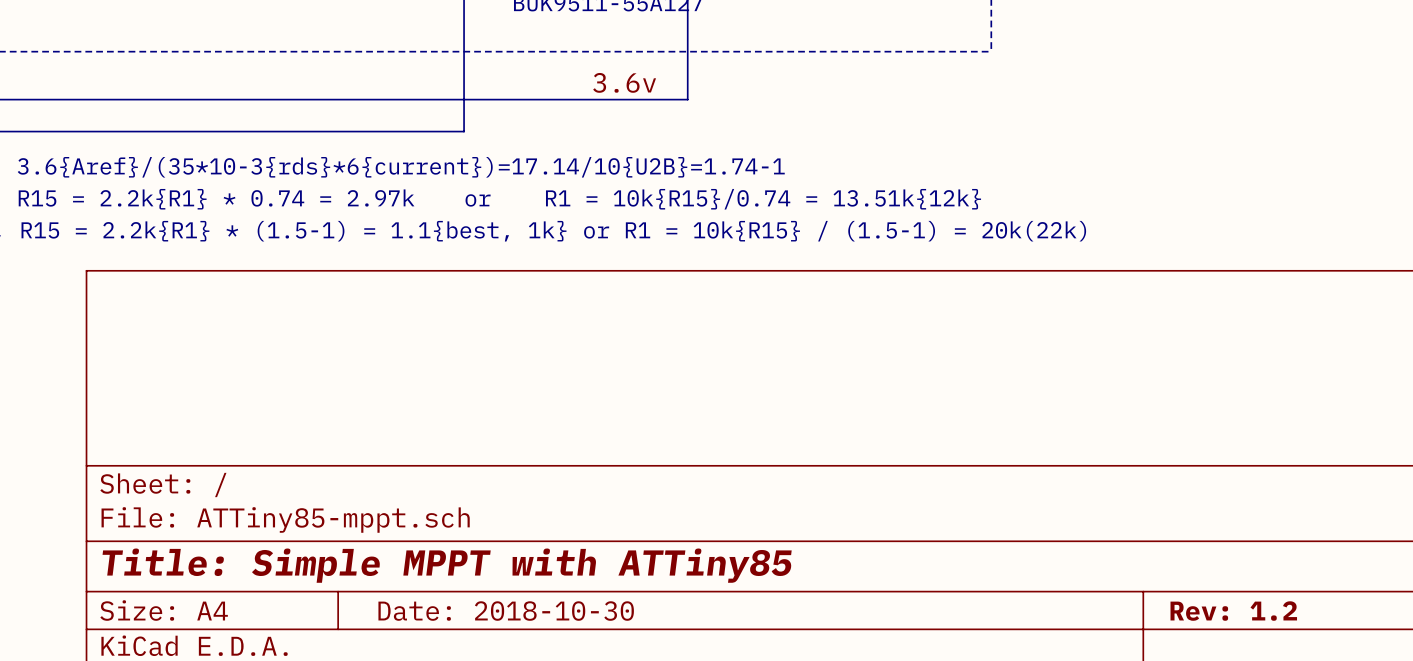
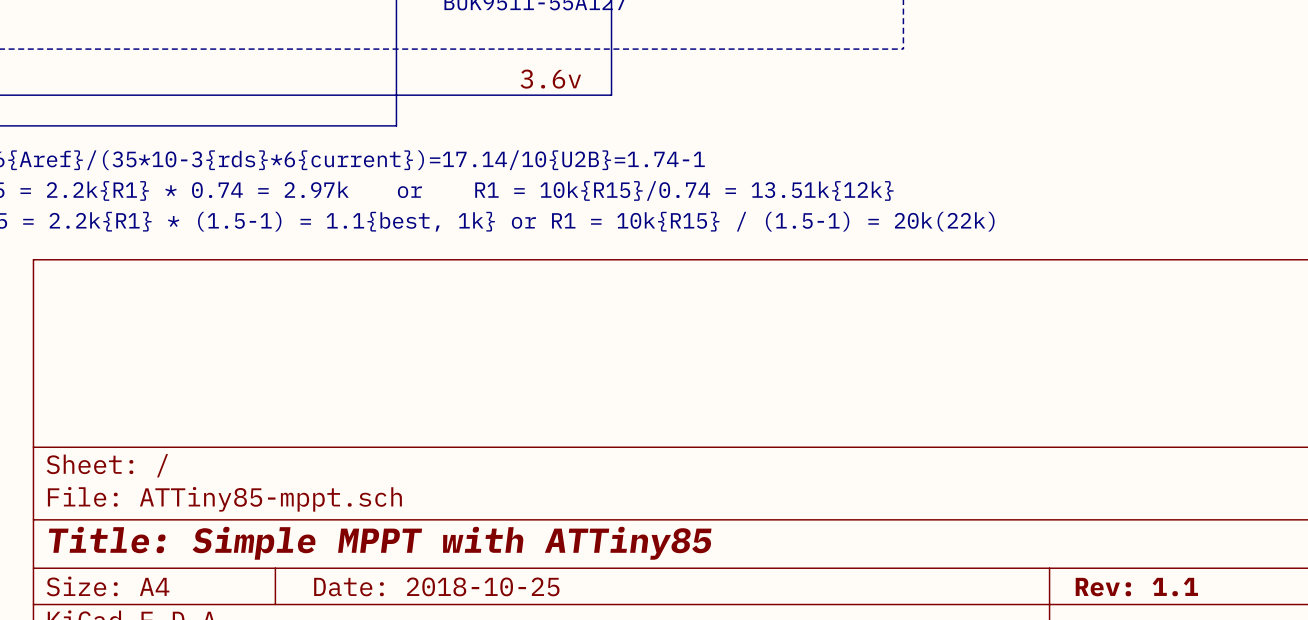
title block: Date: 2018-10-30 (506, 611) -> Date: 2018-10-25 (436, 586)
title block: Rev: 1.2 (1233, 611) -> Rev: 1.1 (1136, 587)

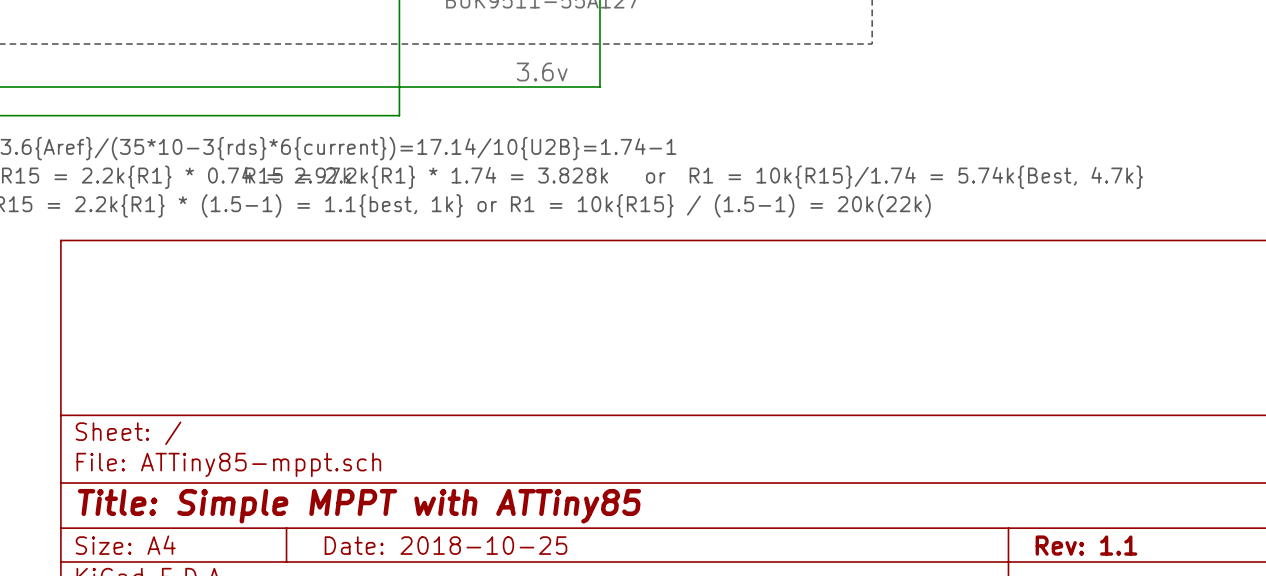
text: none -> R15 = 2.2k{R1} * 1.74 = 3.828k (426, 177)
text: R1 = 10k{R15}/0.74 = 13.51k{12k} (684, 190) -> none
text: none -> R1 = 10k{R15}/1.74 = 5.74k{Best, 4.7k} (916, 177)
text position: or (409, 192) -> or (655, 177)

